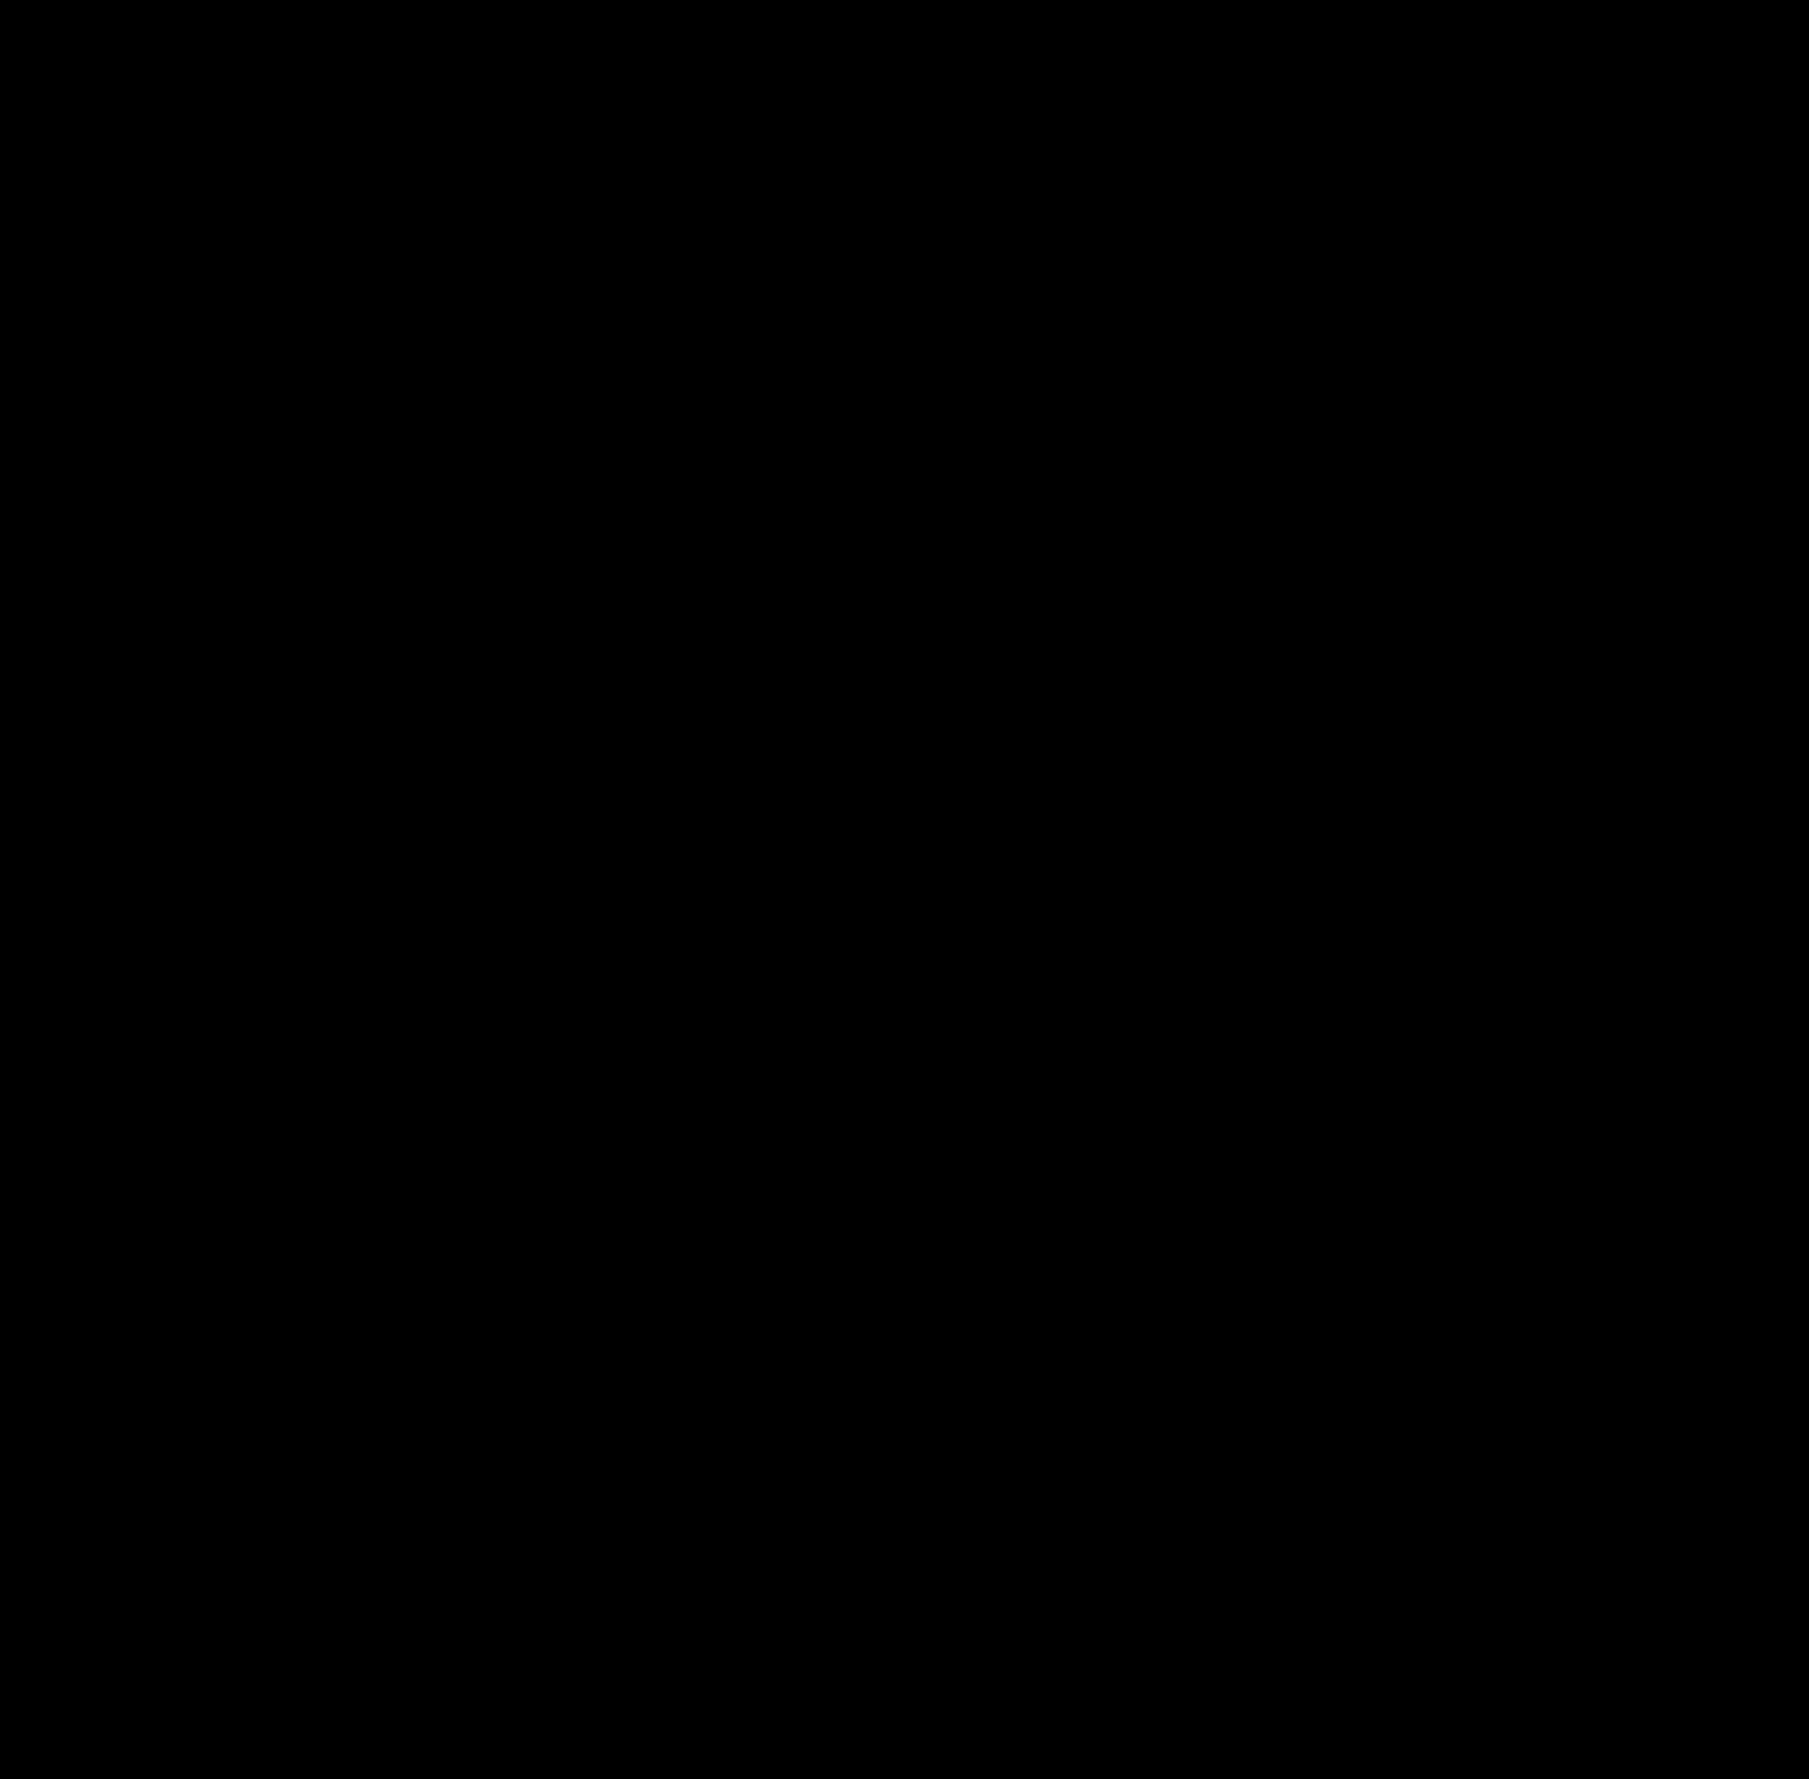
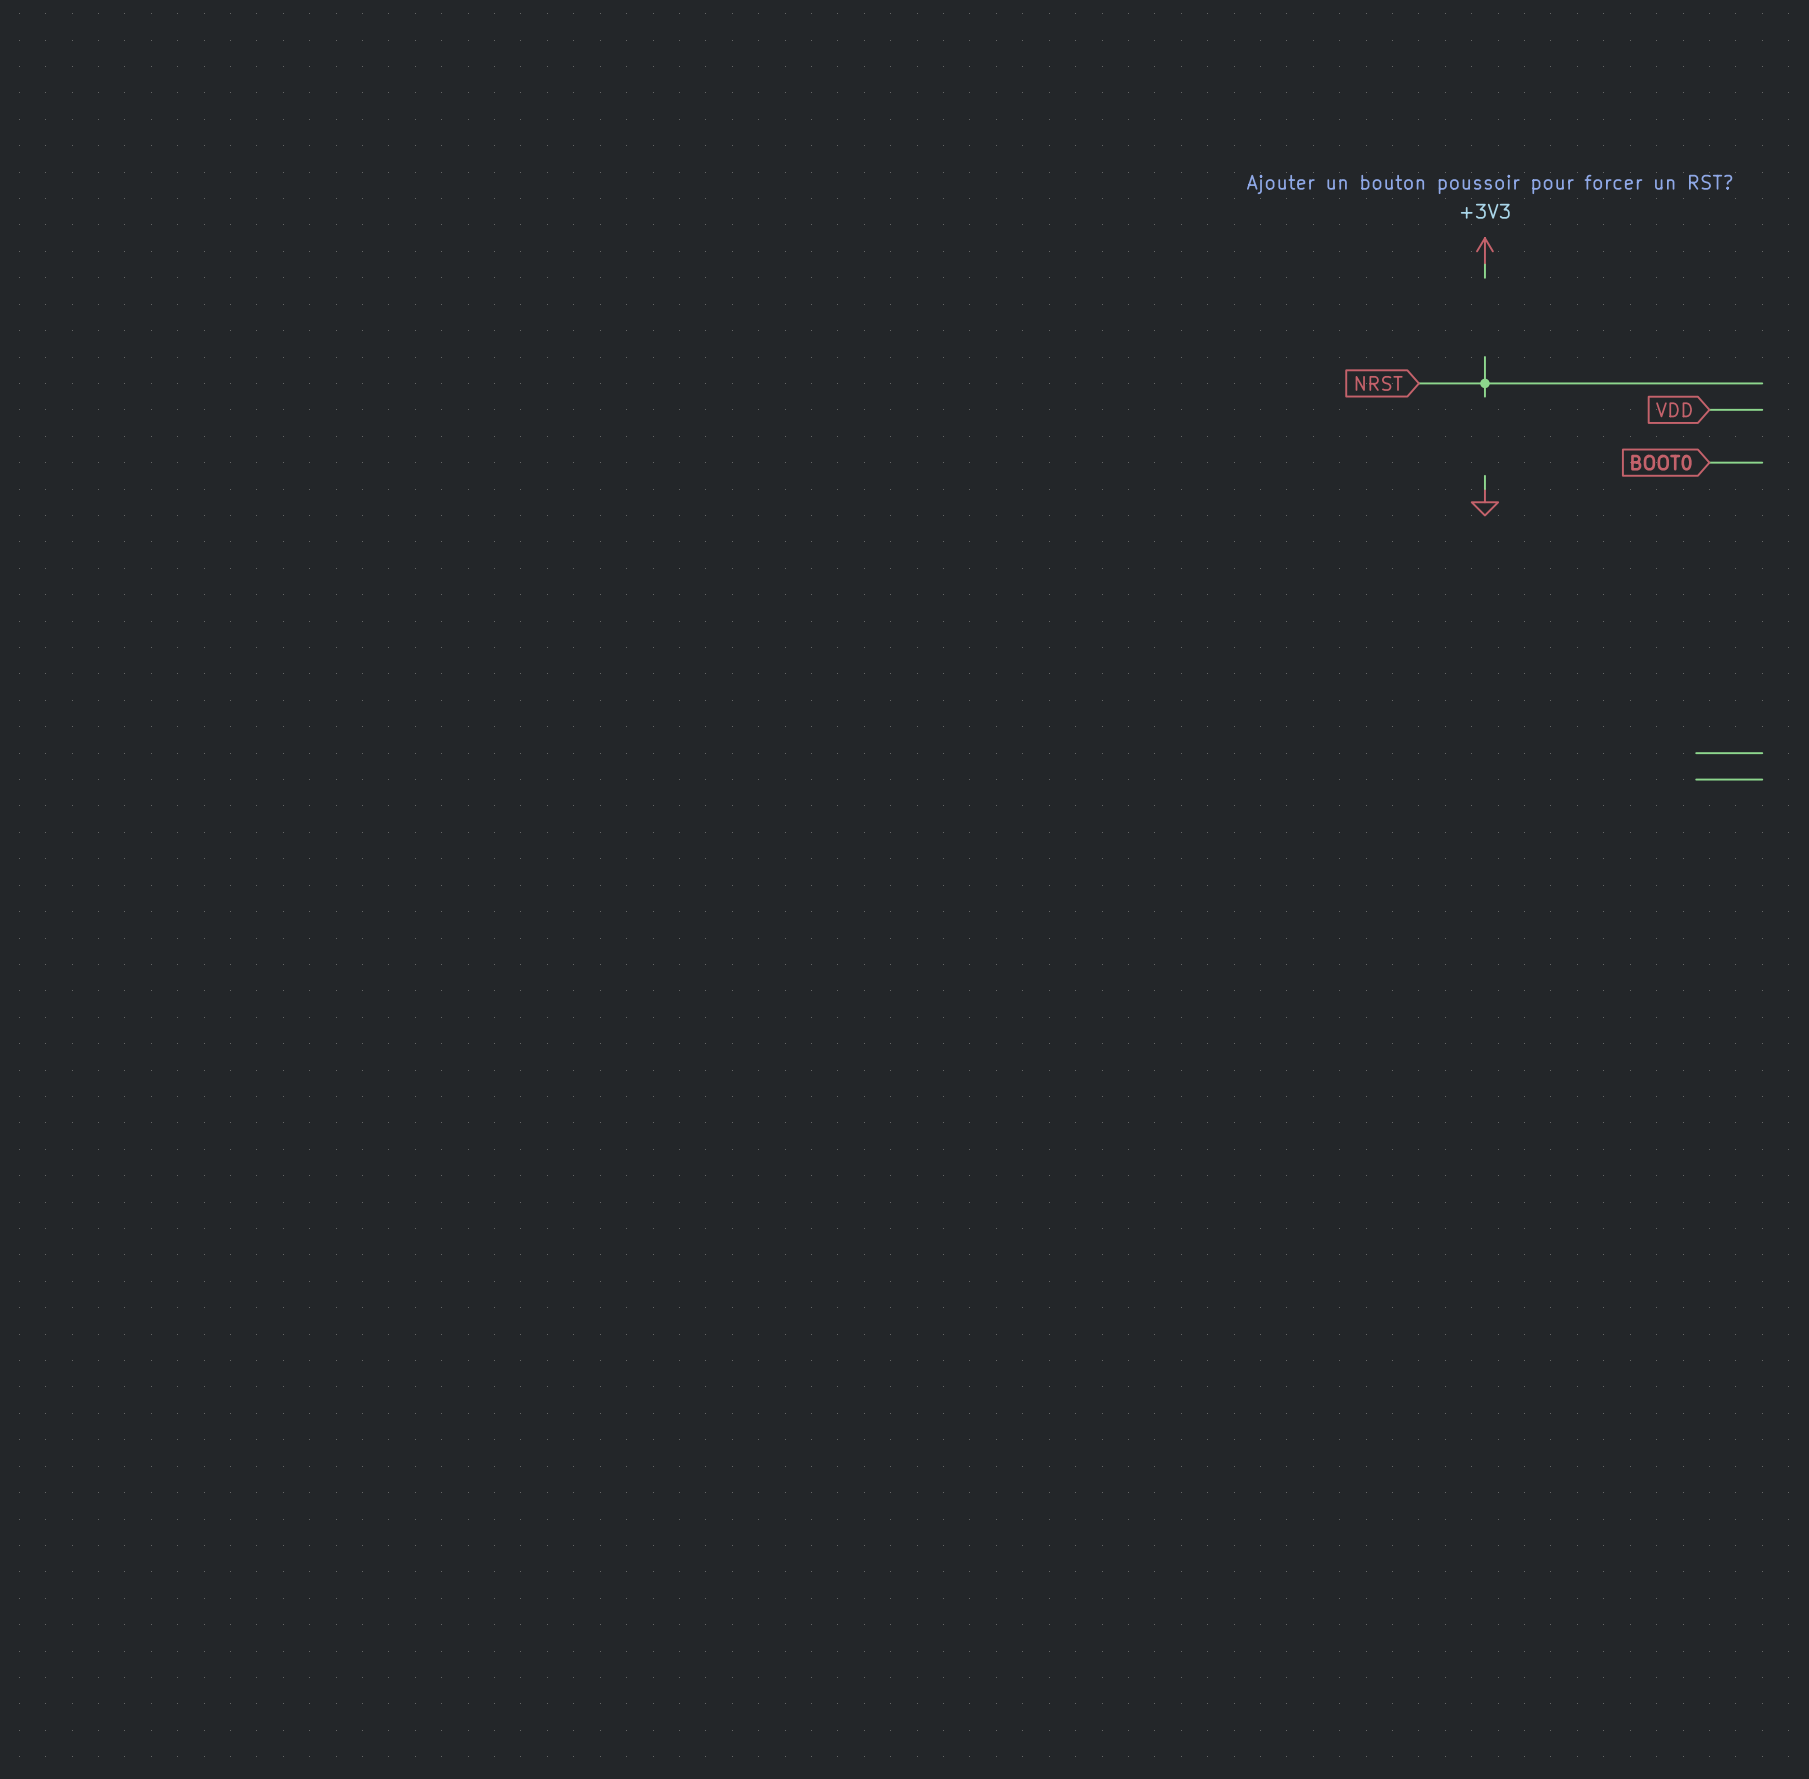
text: none -> Ajouter un bouton poussoir pour forcer un RST? (1489, 184)
power symbol: none -> +3V3 (1484, 251)
wire: none -> (1484, 264) (1484, 277)
wire: none -> (1484, 357) (1484, 396)
global label: none -> NRST (1379, 383)
wire: none -> (1418, 383) (1762, 383)
junction: none -> (1484, 383)
global label: none -> VDD (1674, 409)
wire: none -> (1709, 409) (1762, 409)
global label: none -> BOOT0 (1661, 462)
wire: none -> (1709, 462) (1762, 462)
wire: none -> (1484, 475) (1484, 489)
power symbol: none -> (1484, 502)
wire: none -> (1696, 753) (1762, 753)
wire: none -> (1696, 779) (1762, 779)

